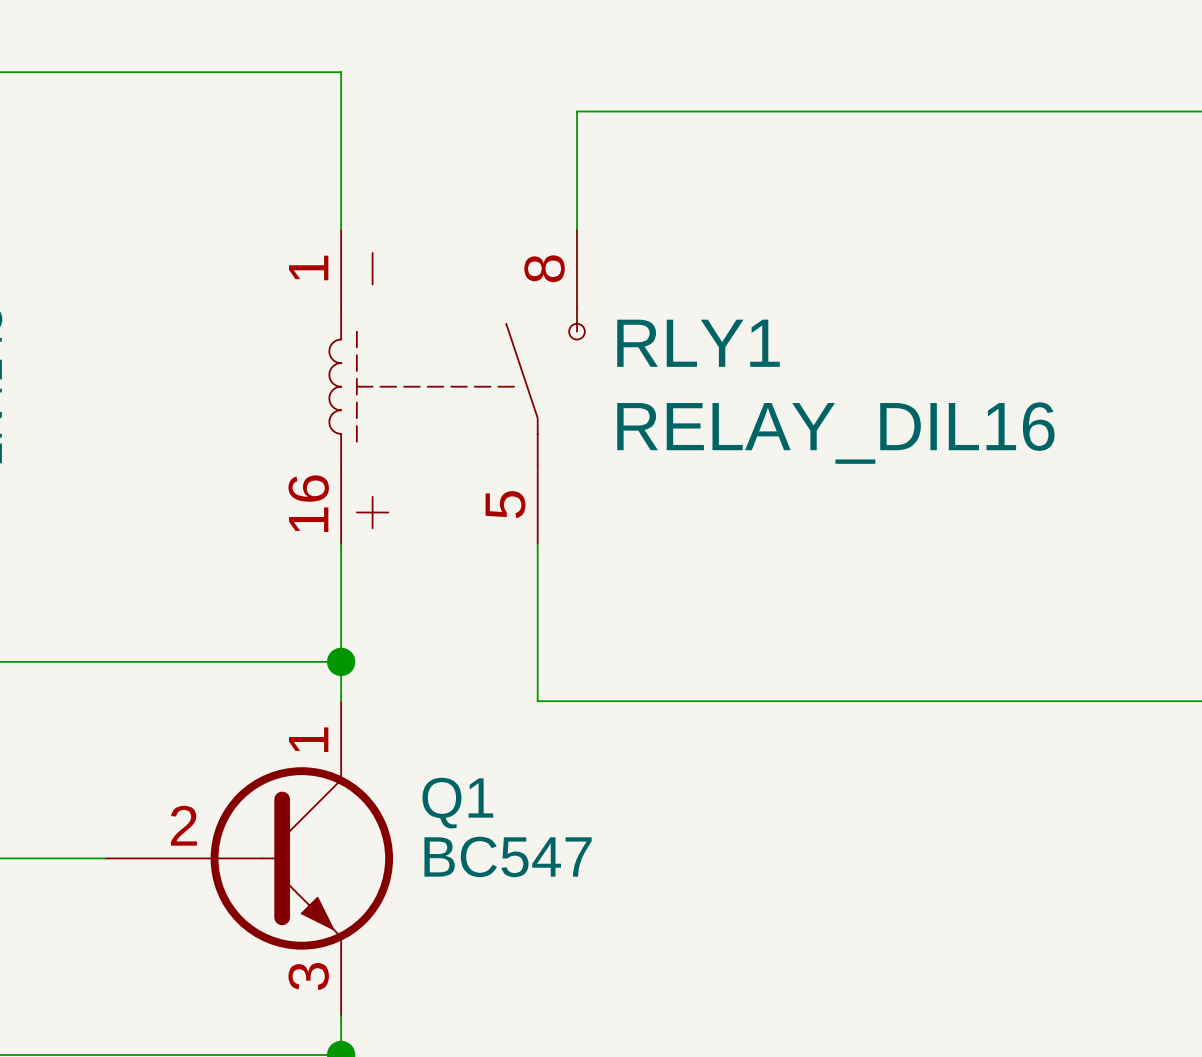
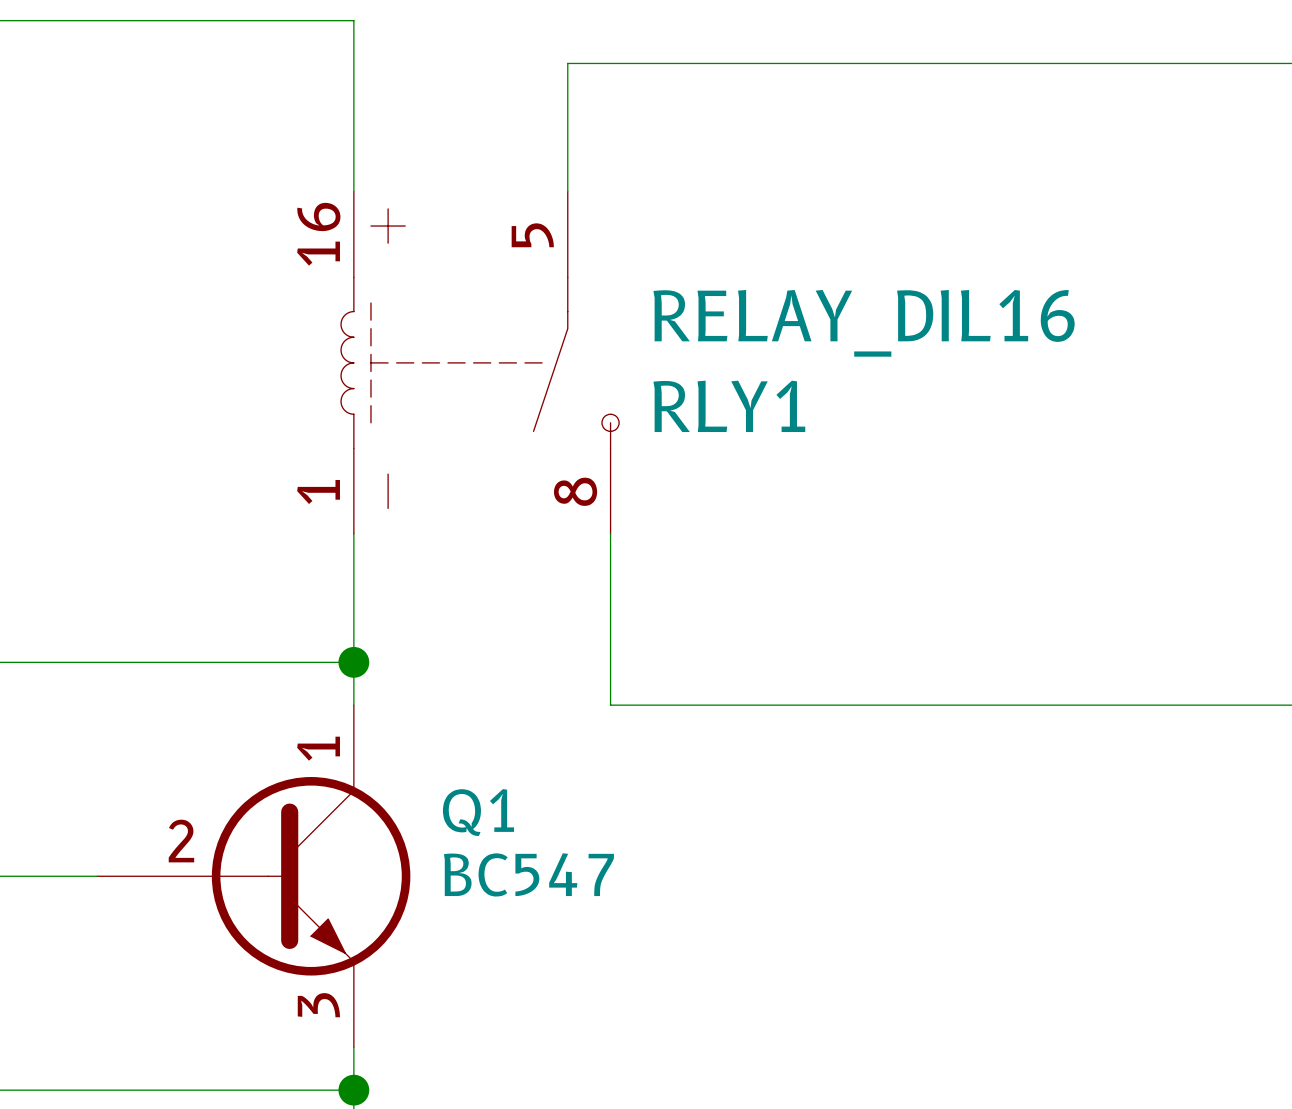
wire: (577, 111) (577, 229) -> (610, 63) (567, 63) (567, 191)
RLY1 flip: as is (457, 390) -> up-down (480, 358)
wire: (537, 543) (537, 701) (577, 701) -> (610, 534) (610, 705)

